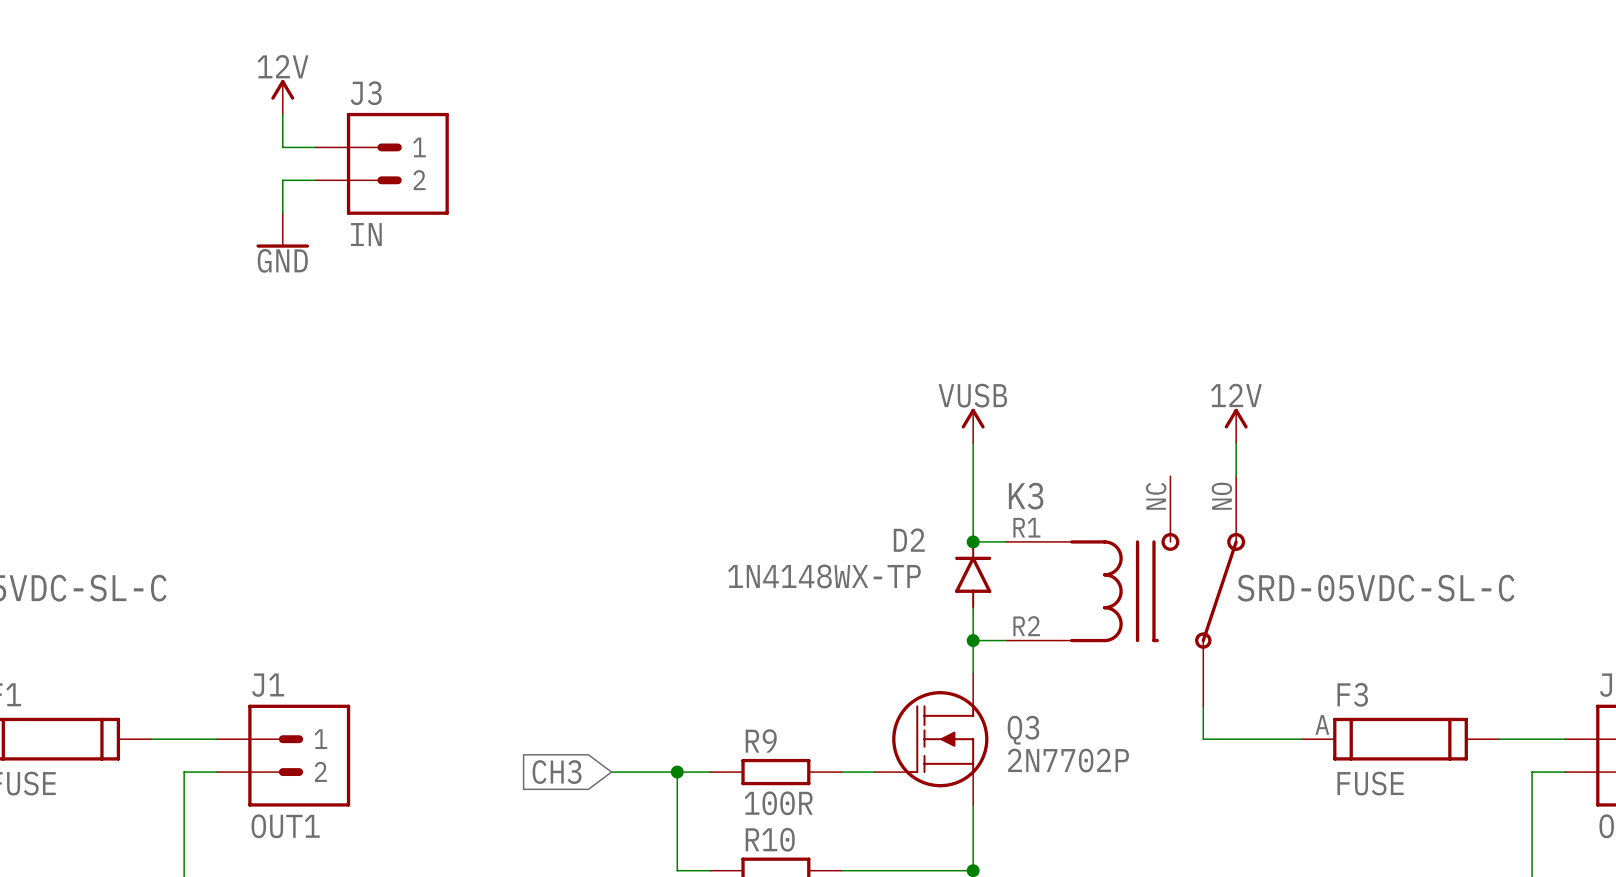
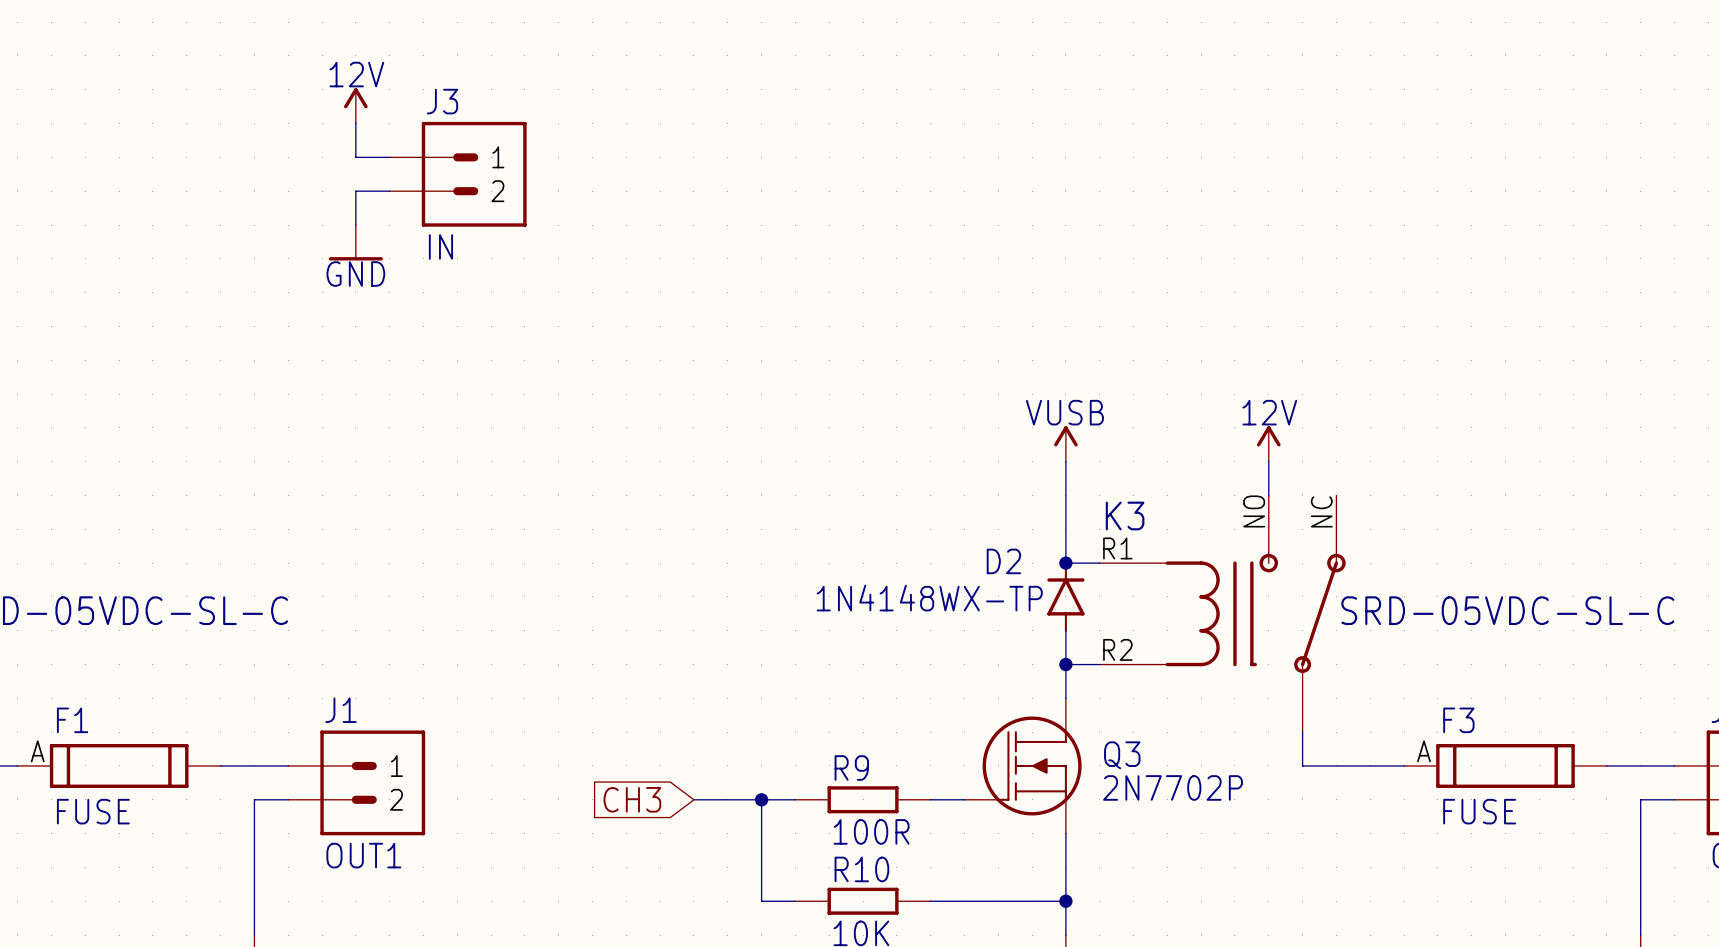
power symbol position: 12V (1236, 426) -> 12V (1268, 443)
wire: (1236, 443) (1236, 476) -> (1268, 461) (1268, 495)
K3 pin number: NC (1156, 496) -> NO (1254, 511)
K3 pin number: NO (1221, 496) -> NC (1321, 511)

